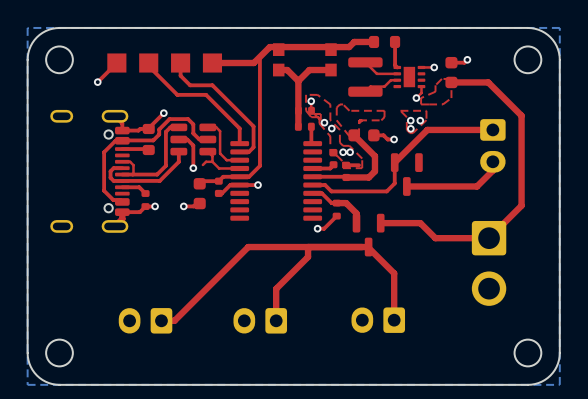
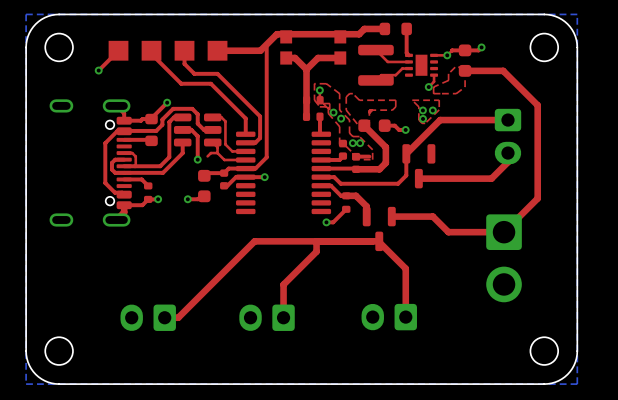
top track: none -> (465, 50) (452, 50) (447, 55)

